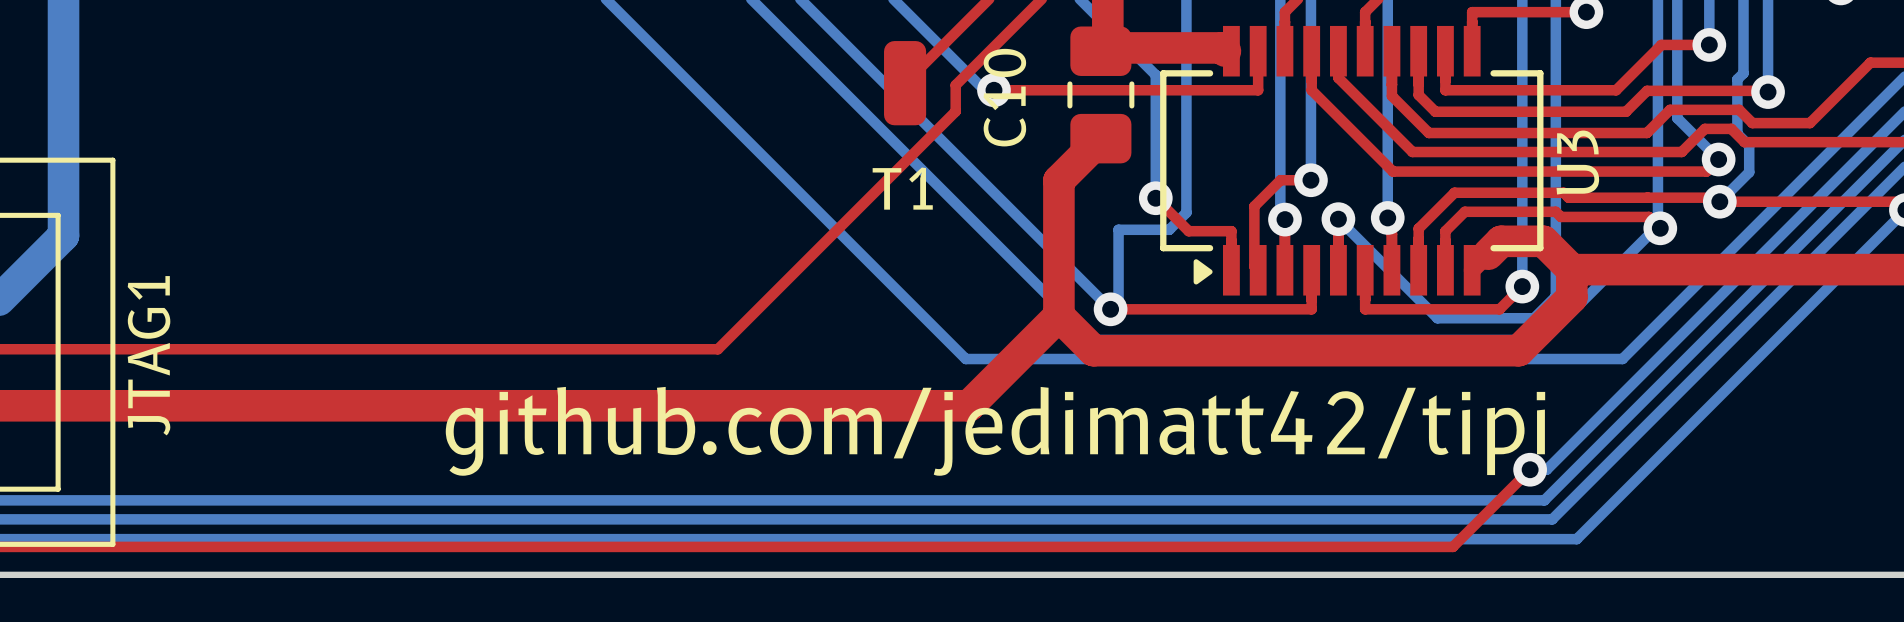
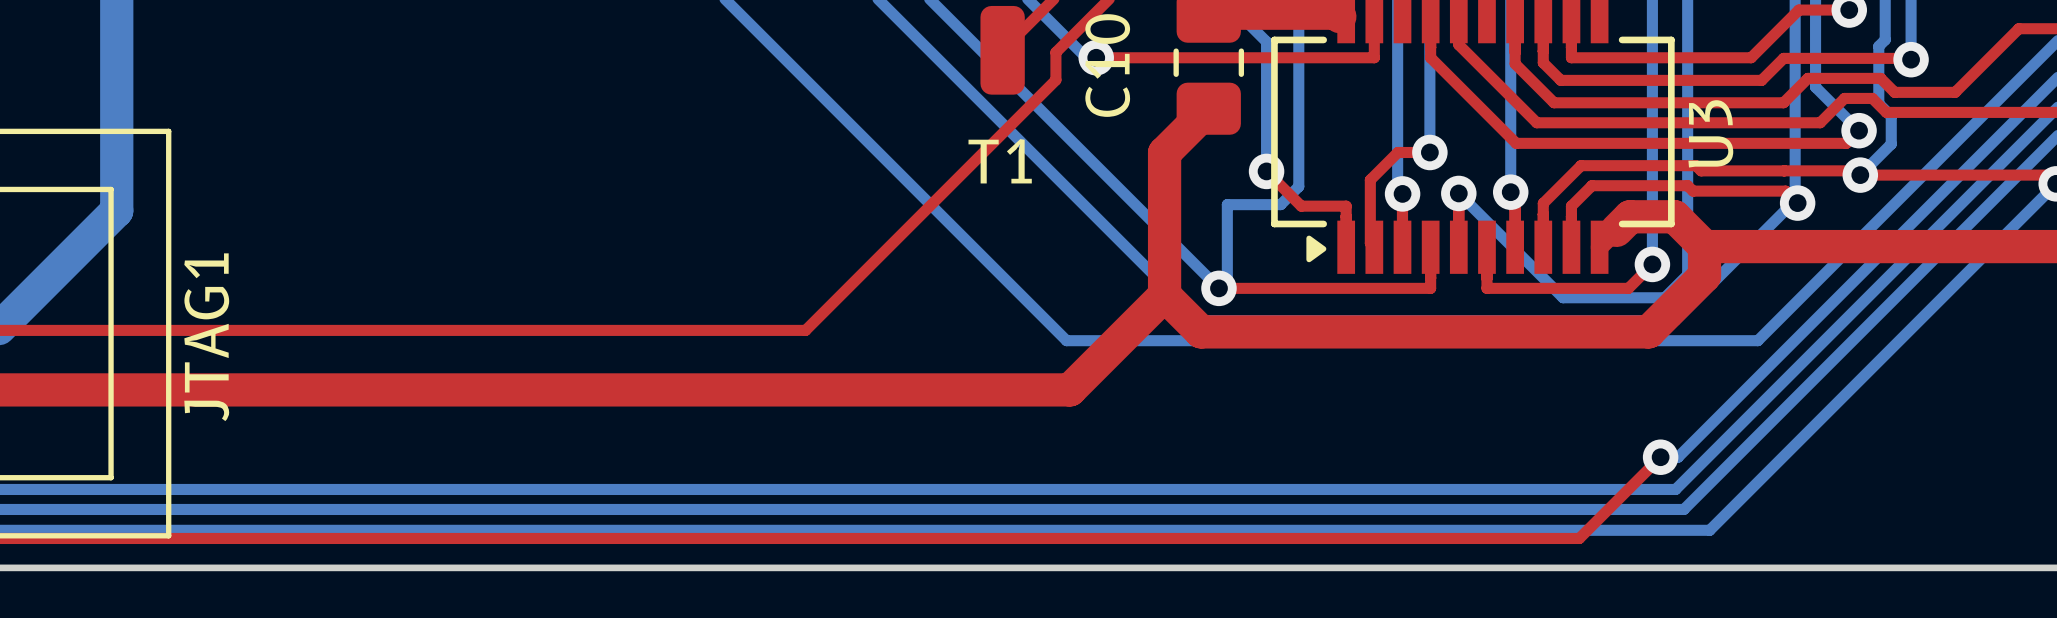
text: github.com/jedimatt42/tipi (995, 431) -> none

